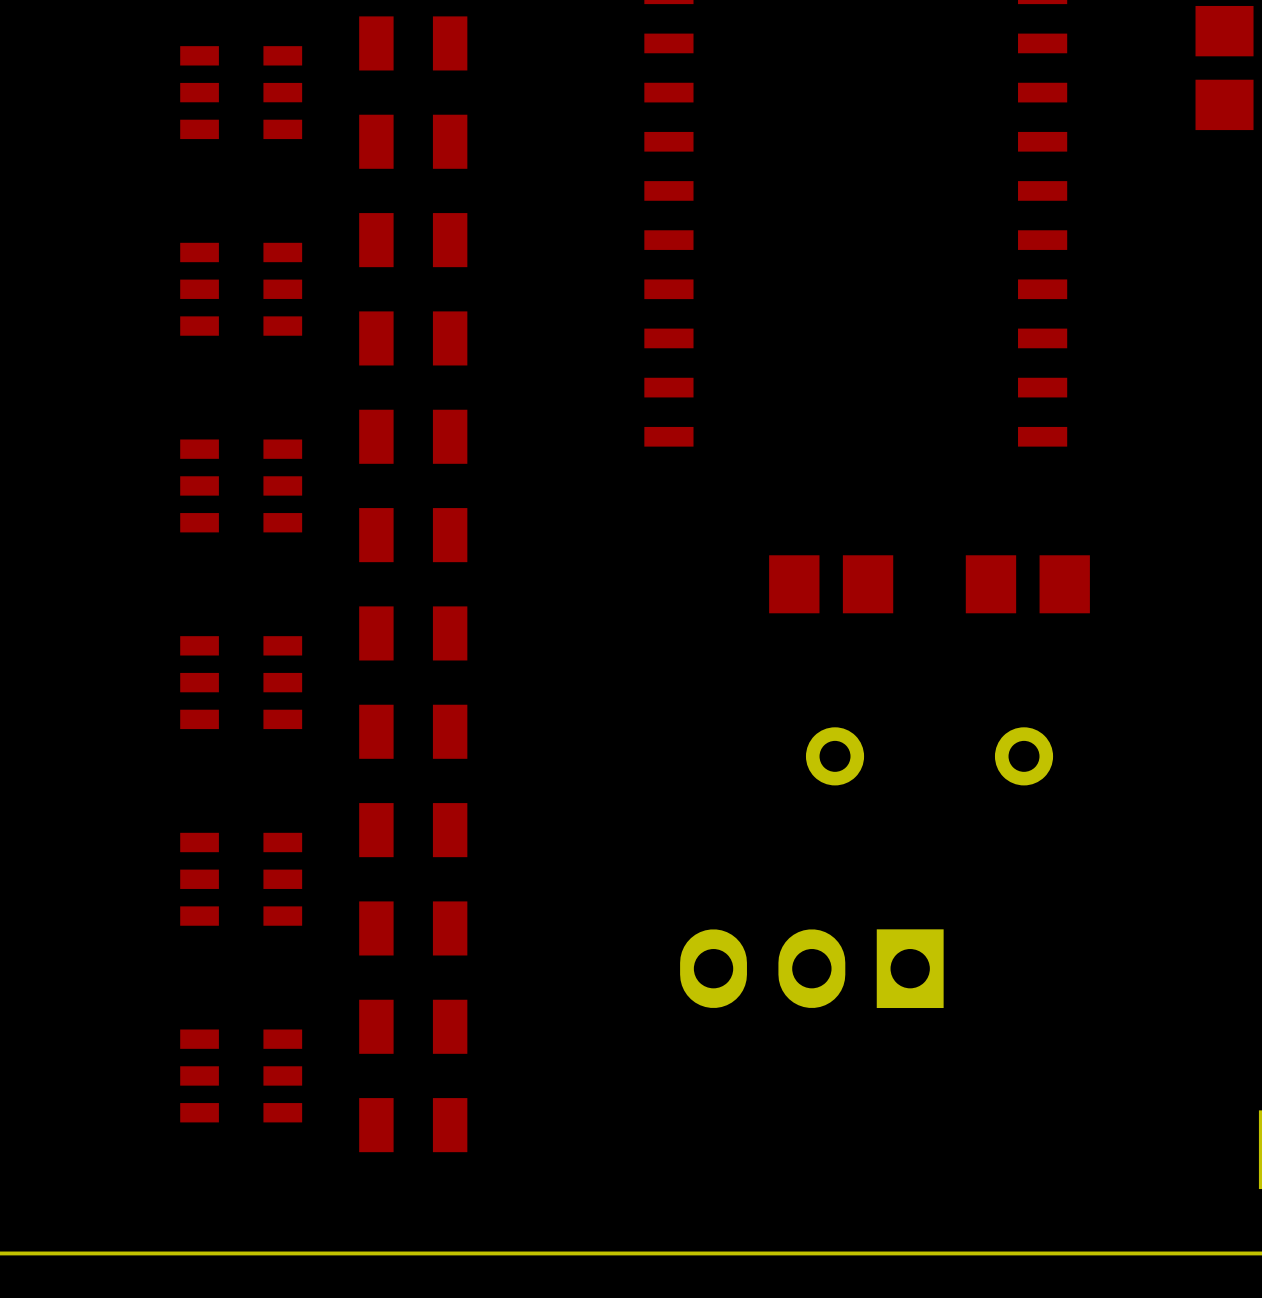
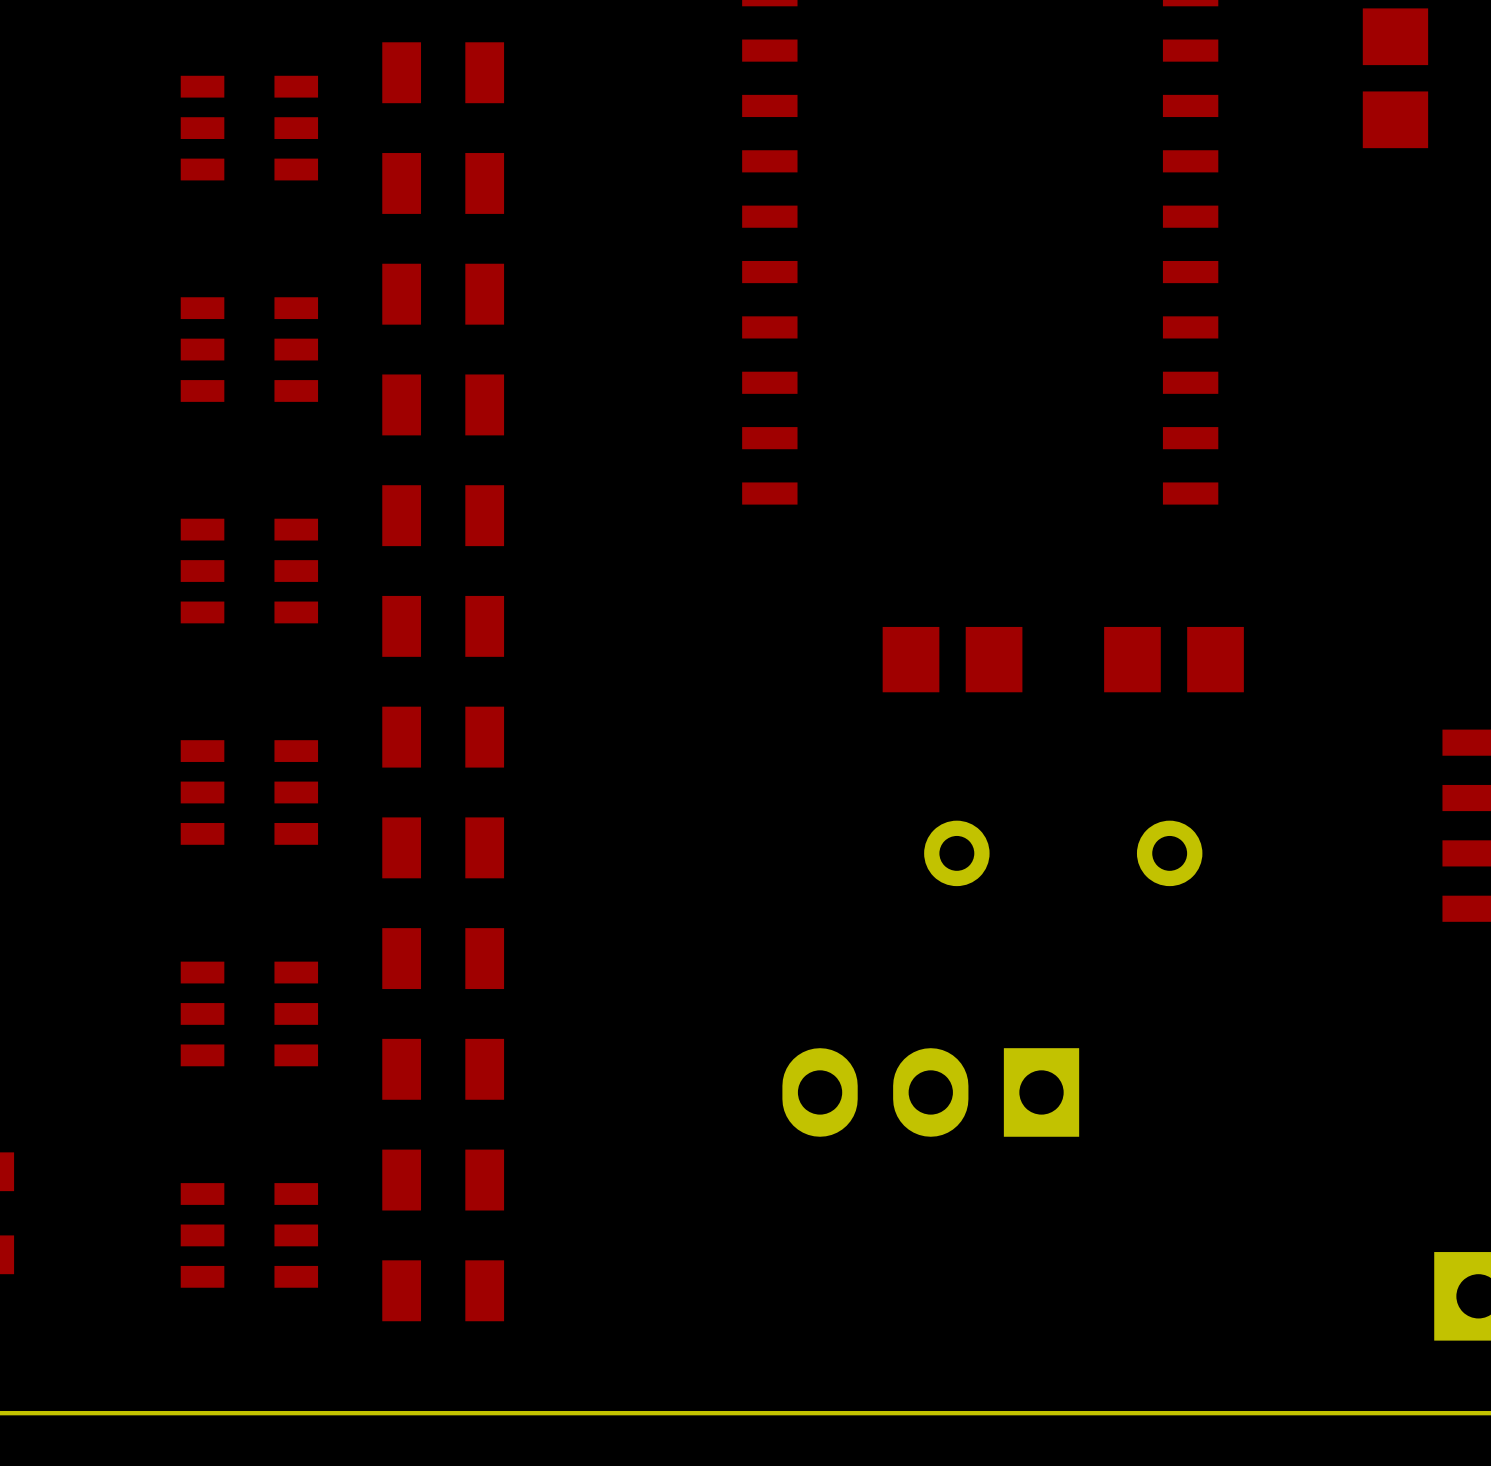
part position: (413, 43) -> (443, 72)
part position: (241, 92) -> (249, 128)
part position: (413, 141) -> (443, 183)
part position: (413, 240) -> (443, 294)
part position: (241, 289) -> (249, 349)
part position: (413, 338) -> (443, 404)
part position: (413, 436) -> (443, 515)
part position: (241, 485) -> (249, 571)
part position: (413, 535) -> (443, 626)
part position: (413, 633) -> (443, 737)
part position: (241, 682) -> (249, 792)
part position: (413, 731) -> (443, 847)
part position: (413, 830) -> (443, 958)
part position: (241, 879) -> (249, 1013)
part position: (413, 928) -> (443, 1069)
part position: (413, 1026) -> (443, 1180)
part position: (241, 1075) -> (249, 1235)
part position: (413, 1125) -> (443, 1290)

